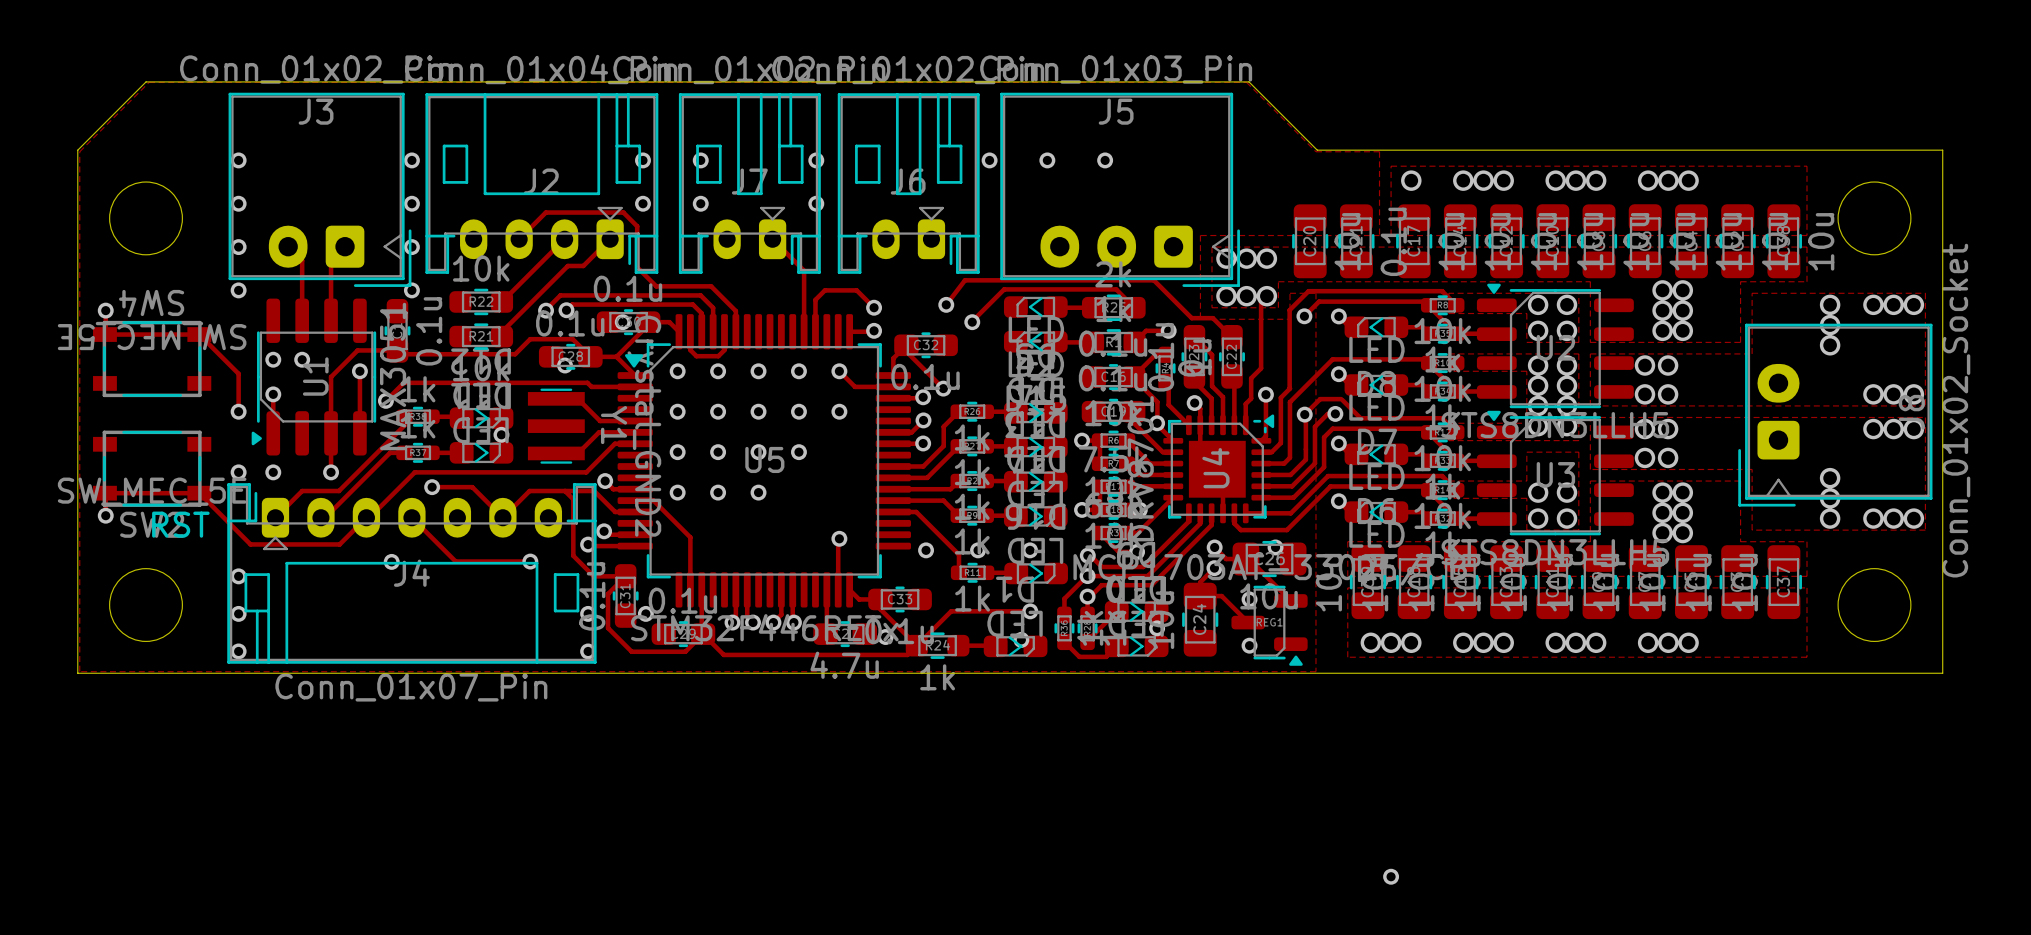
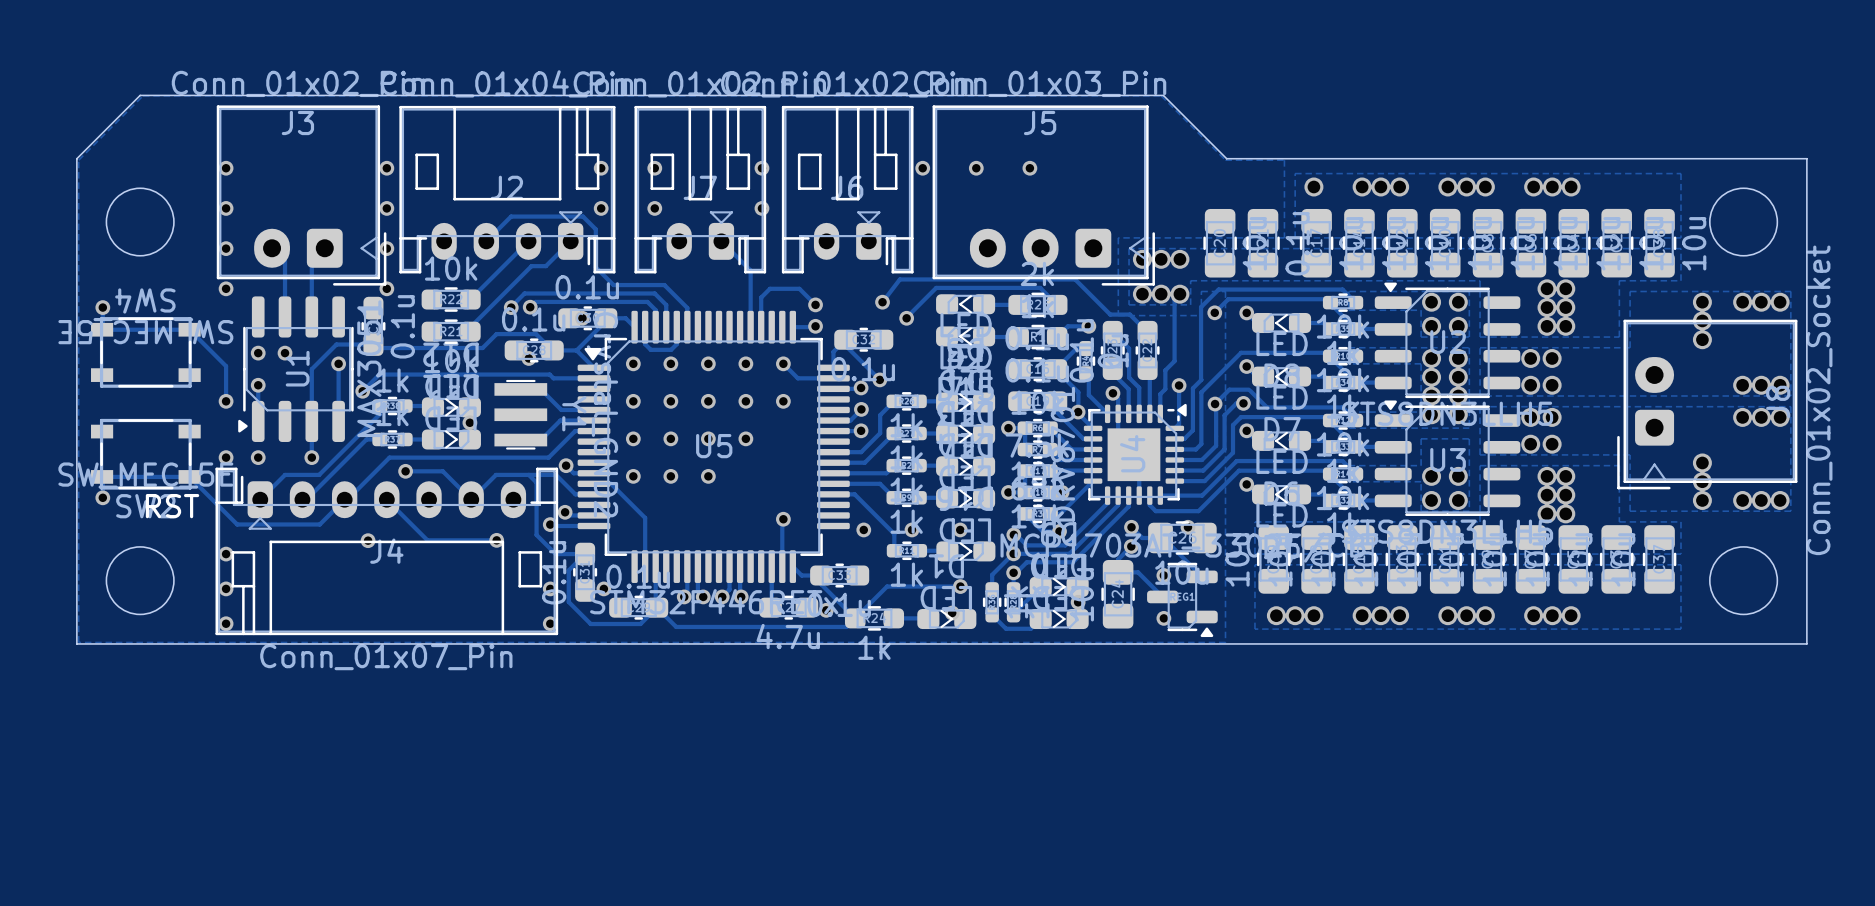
via: (1391, 876) -> none

